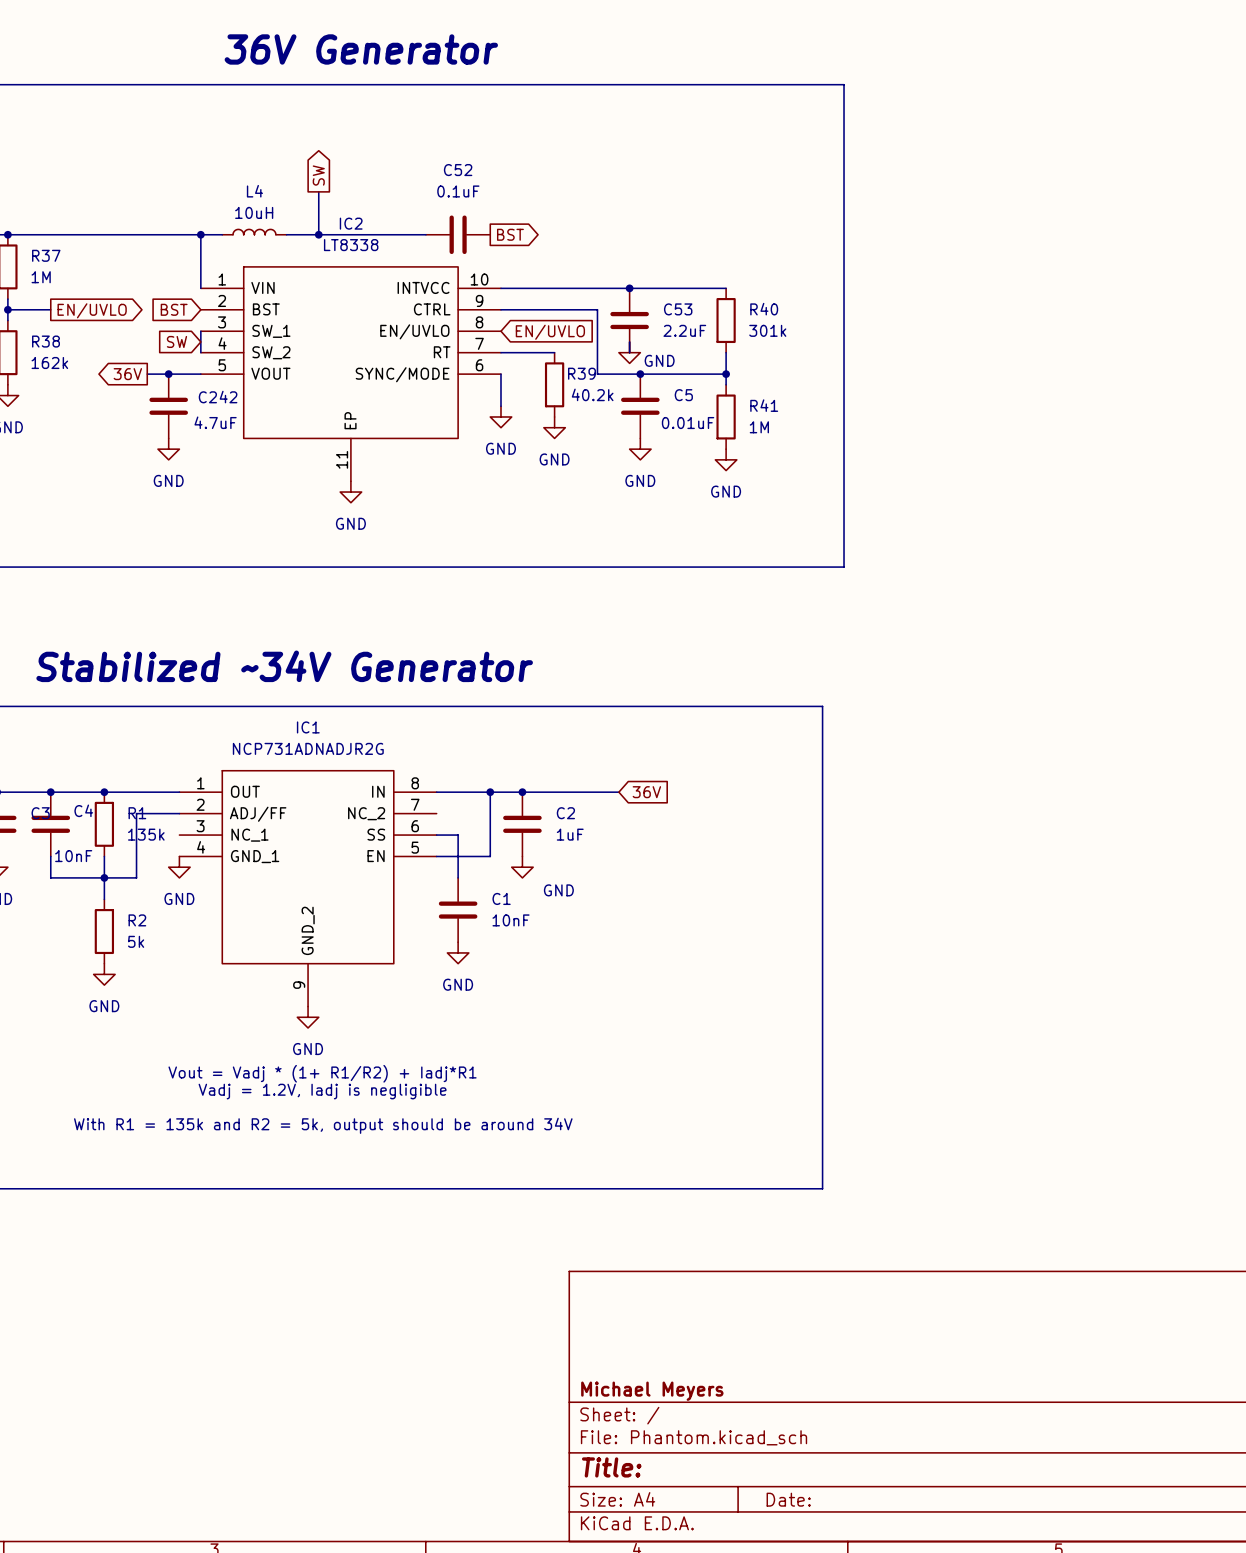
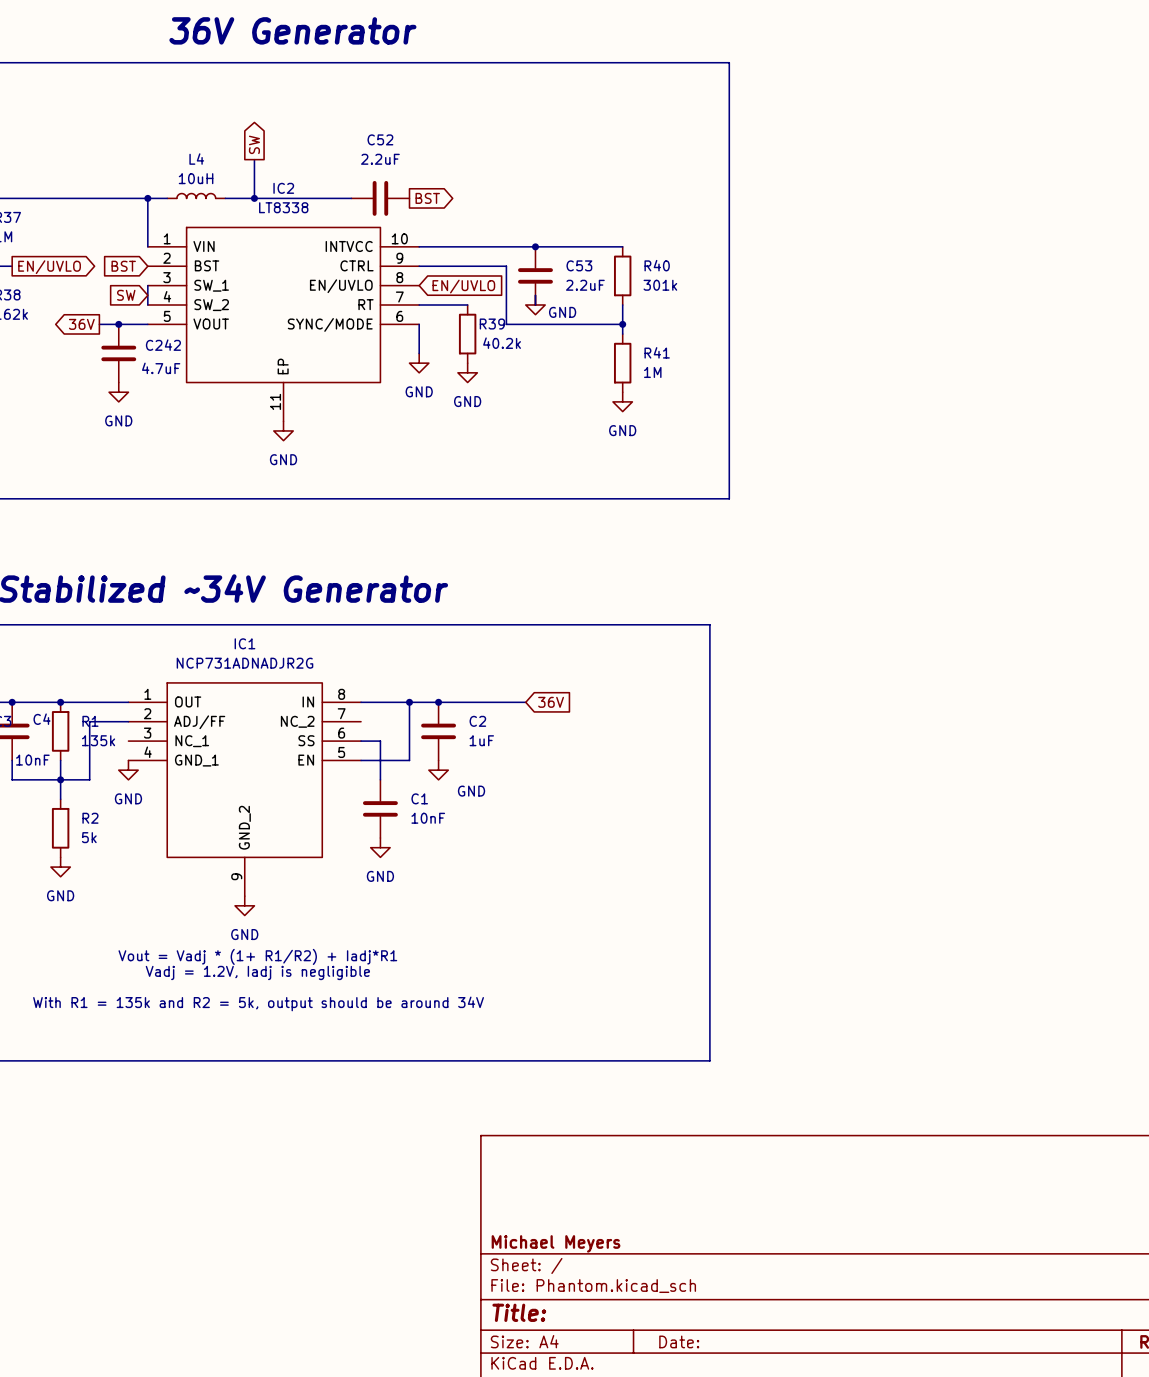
C52 value: 0.1uF (458, 191) -> 2.2uF (380, 159)
junction: (640, 374) -> none
C5: 0.01uF (640, 406) -> none
power symbol: GND (640, 449) -> none

